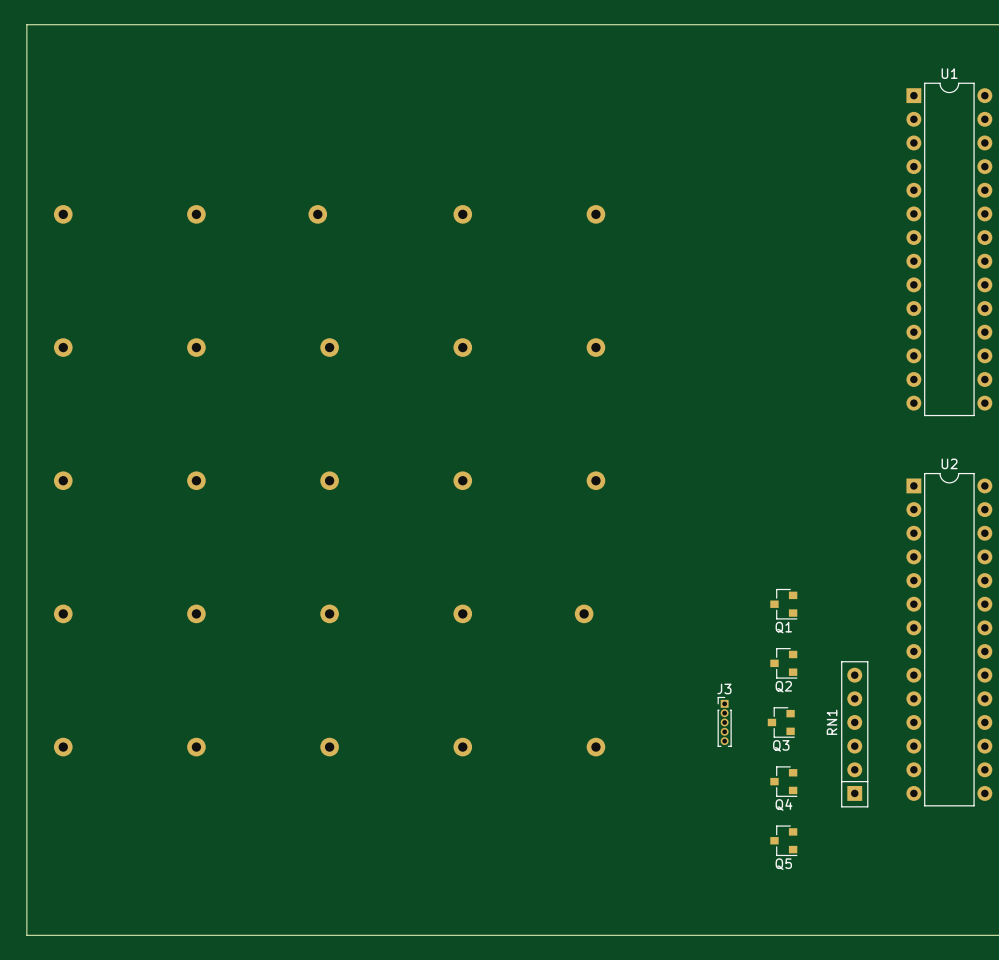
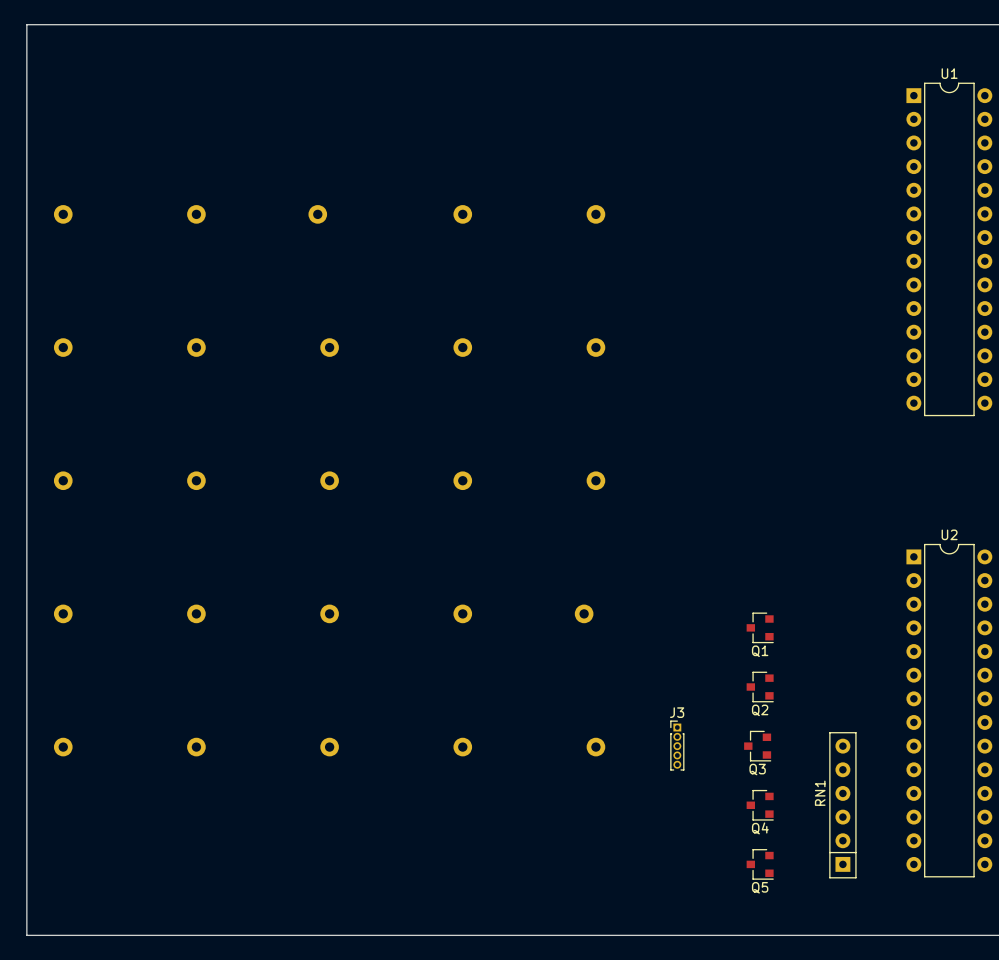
Q1 position: (783, 604) -> (760, 627)
U2 position: (949, 639) -> (949, 710)
Q2 position: (783, 663) -> (760, 687)
J3 position: (724, 721) -> (677, 745)
Q3 position: (781, 722) -> (757, 746)
RN1 position: (854, 734) -> (842, 805)
Q4 position: (783, 781) -> (760, 805)
Q5 position: (783, 840) -> (760, 864)

